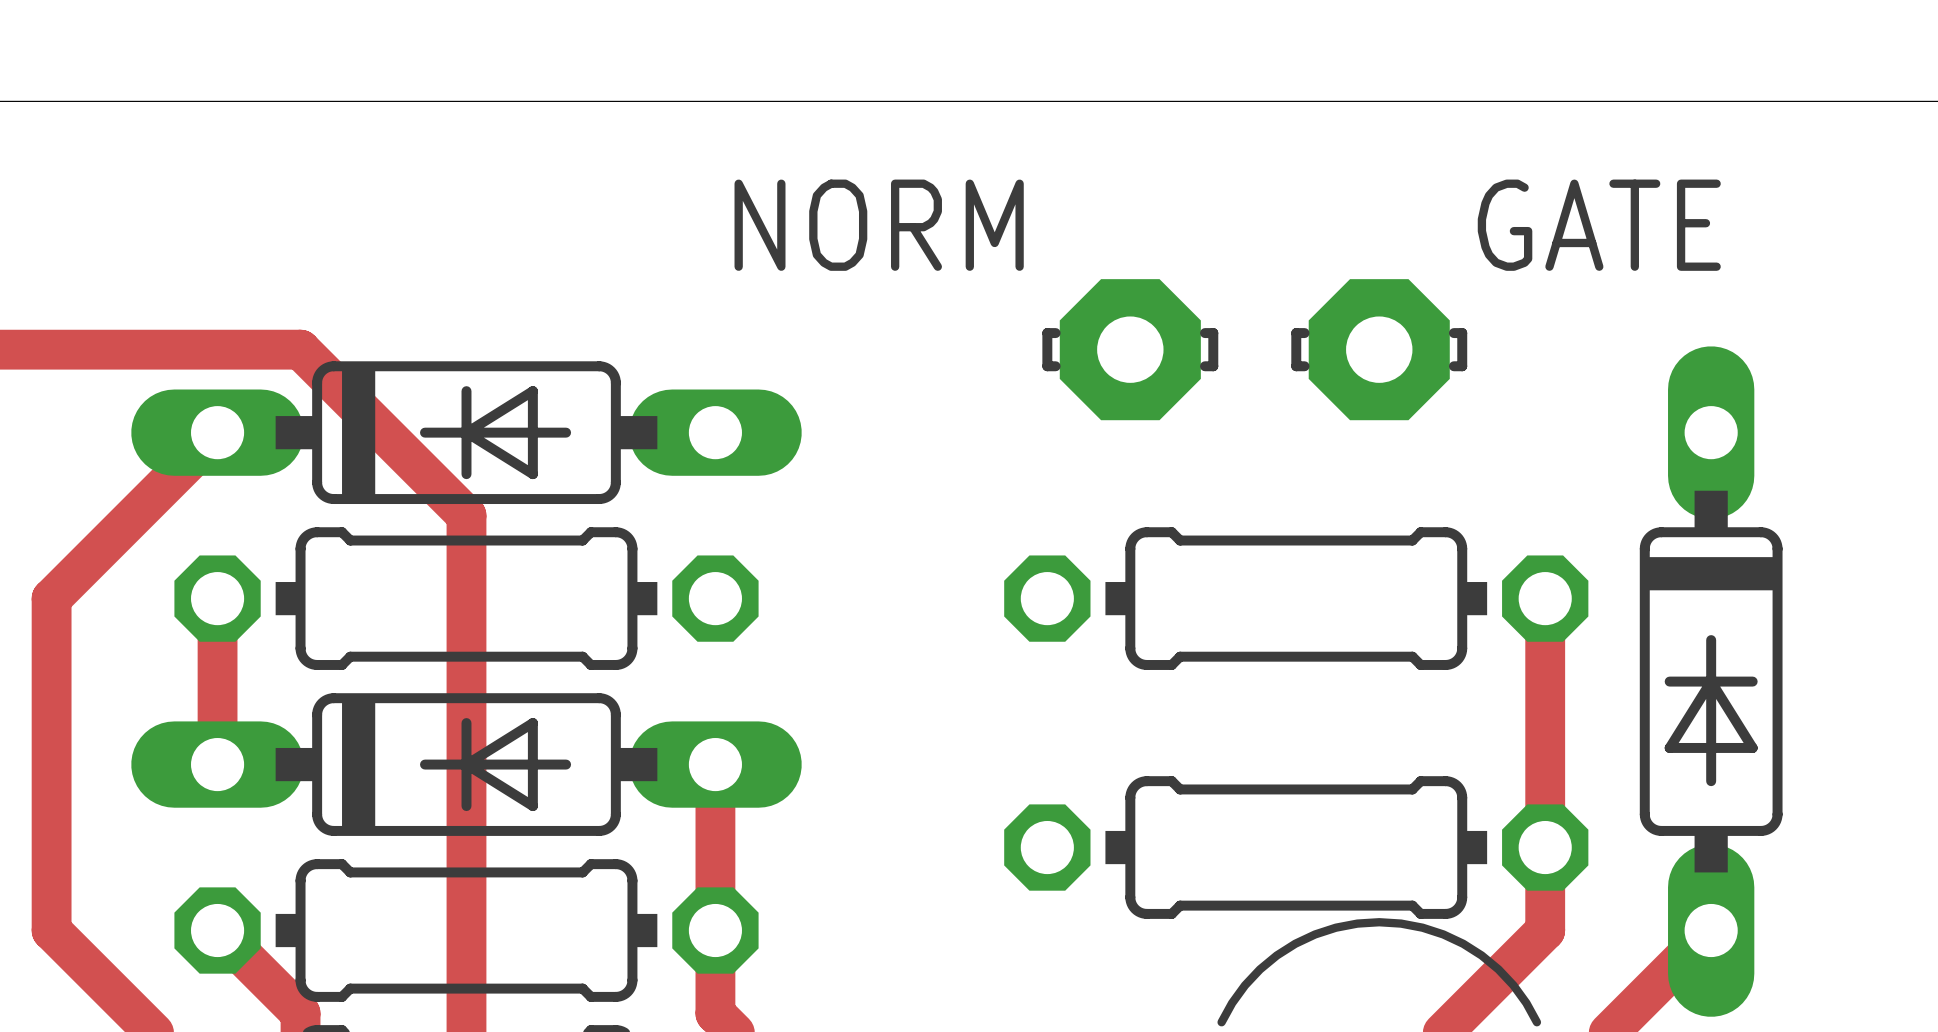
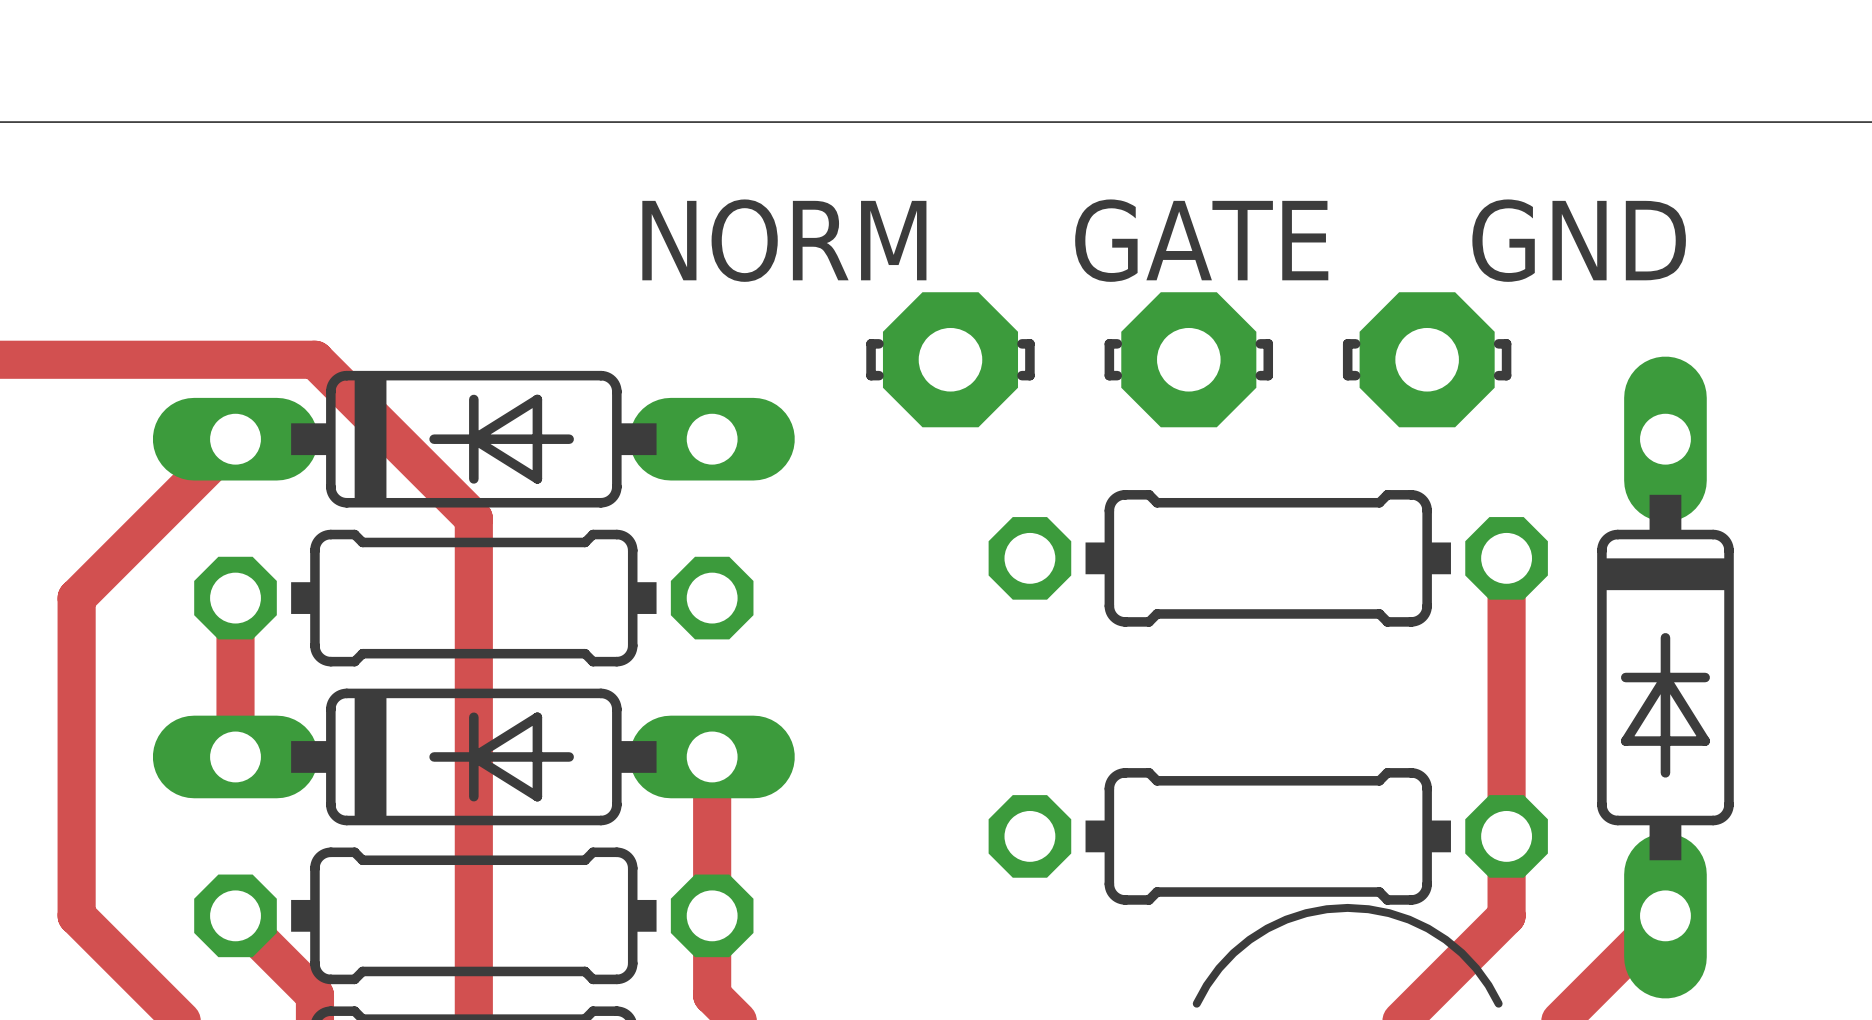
NORM name position: NORM (879, 225) -> NORM (784, 240)
GATE name position: GATE (1599, 225) -> GATE (1201, 240)
NORM position: (1130, 349) -> (950, 359)
GATE position: (1379, 349) -> (1188, 359)
GND: none -> (1427, 359)
part position: (1296, 598) -> (1268, 558)

